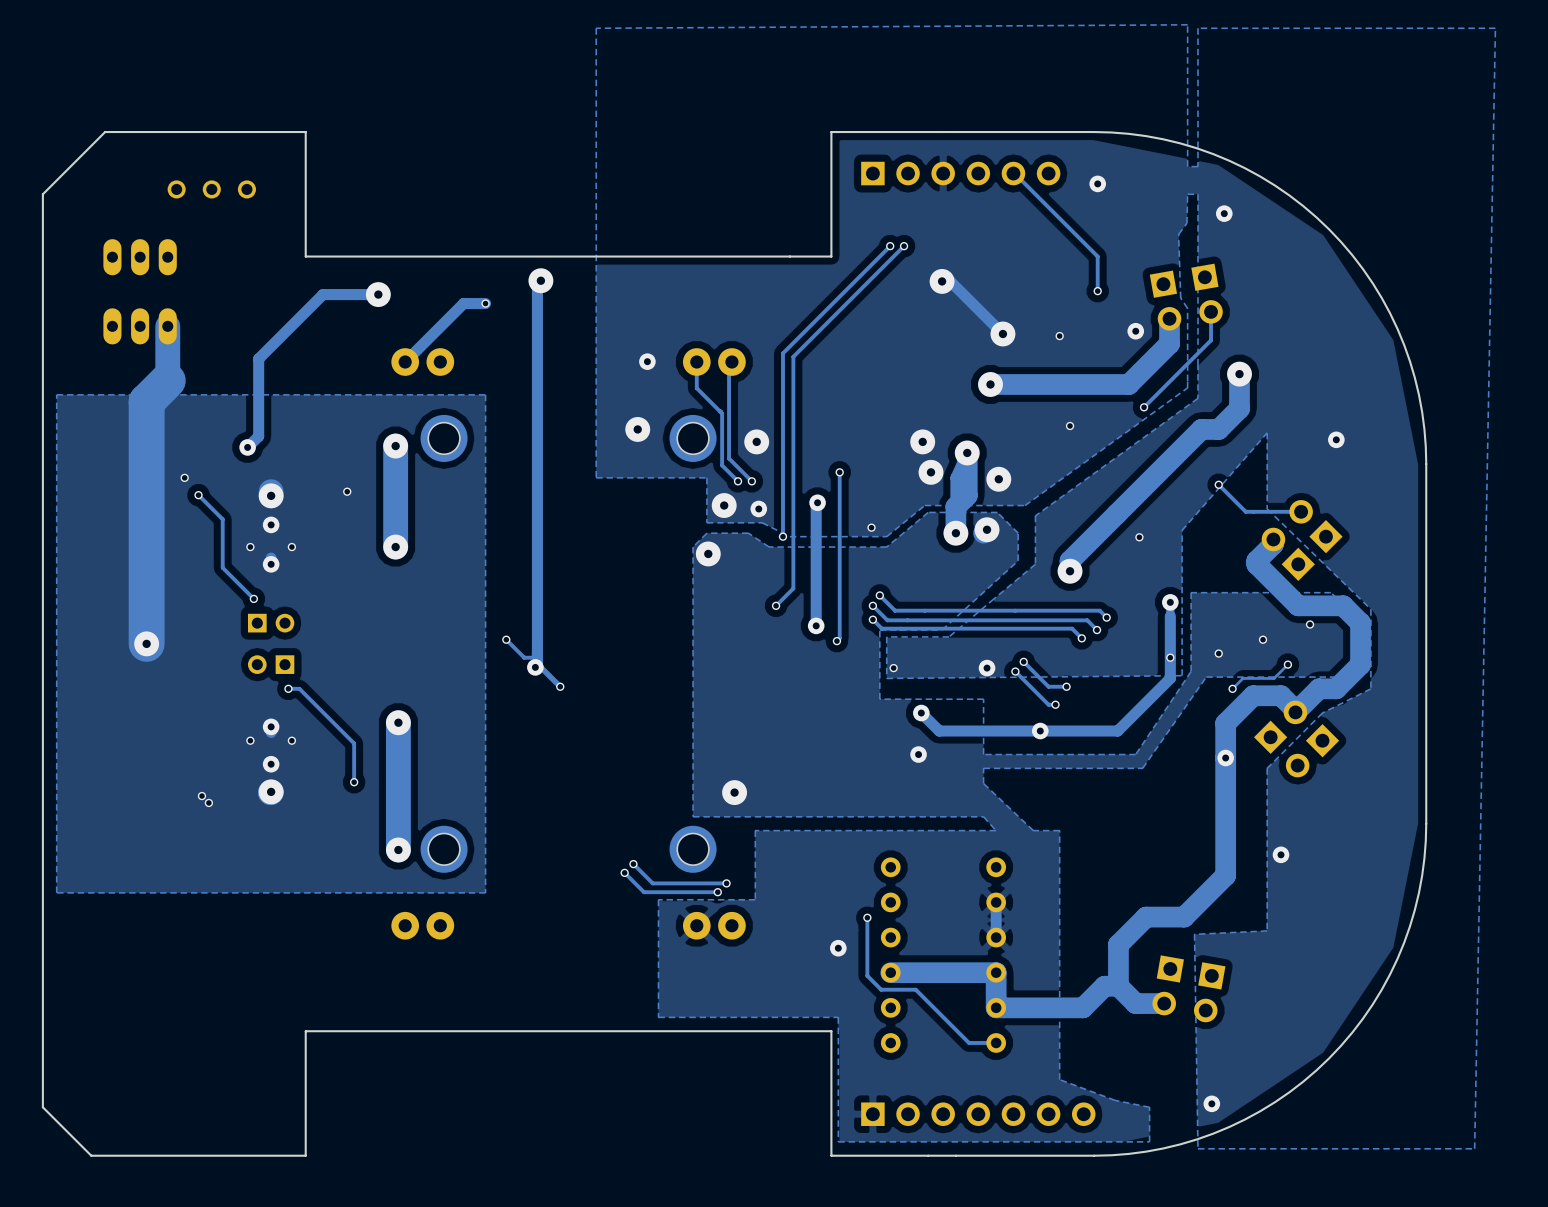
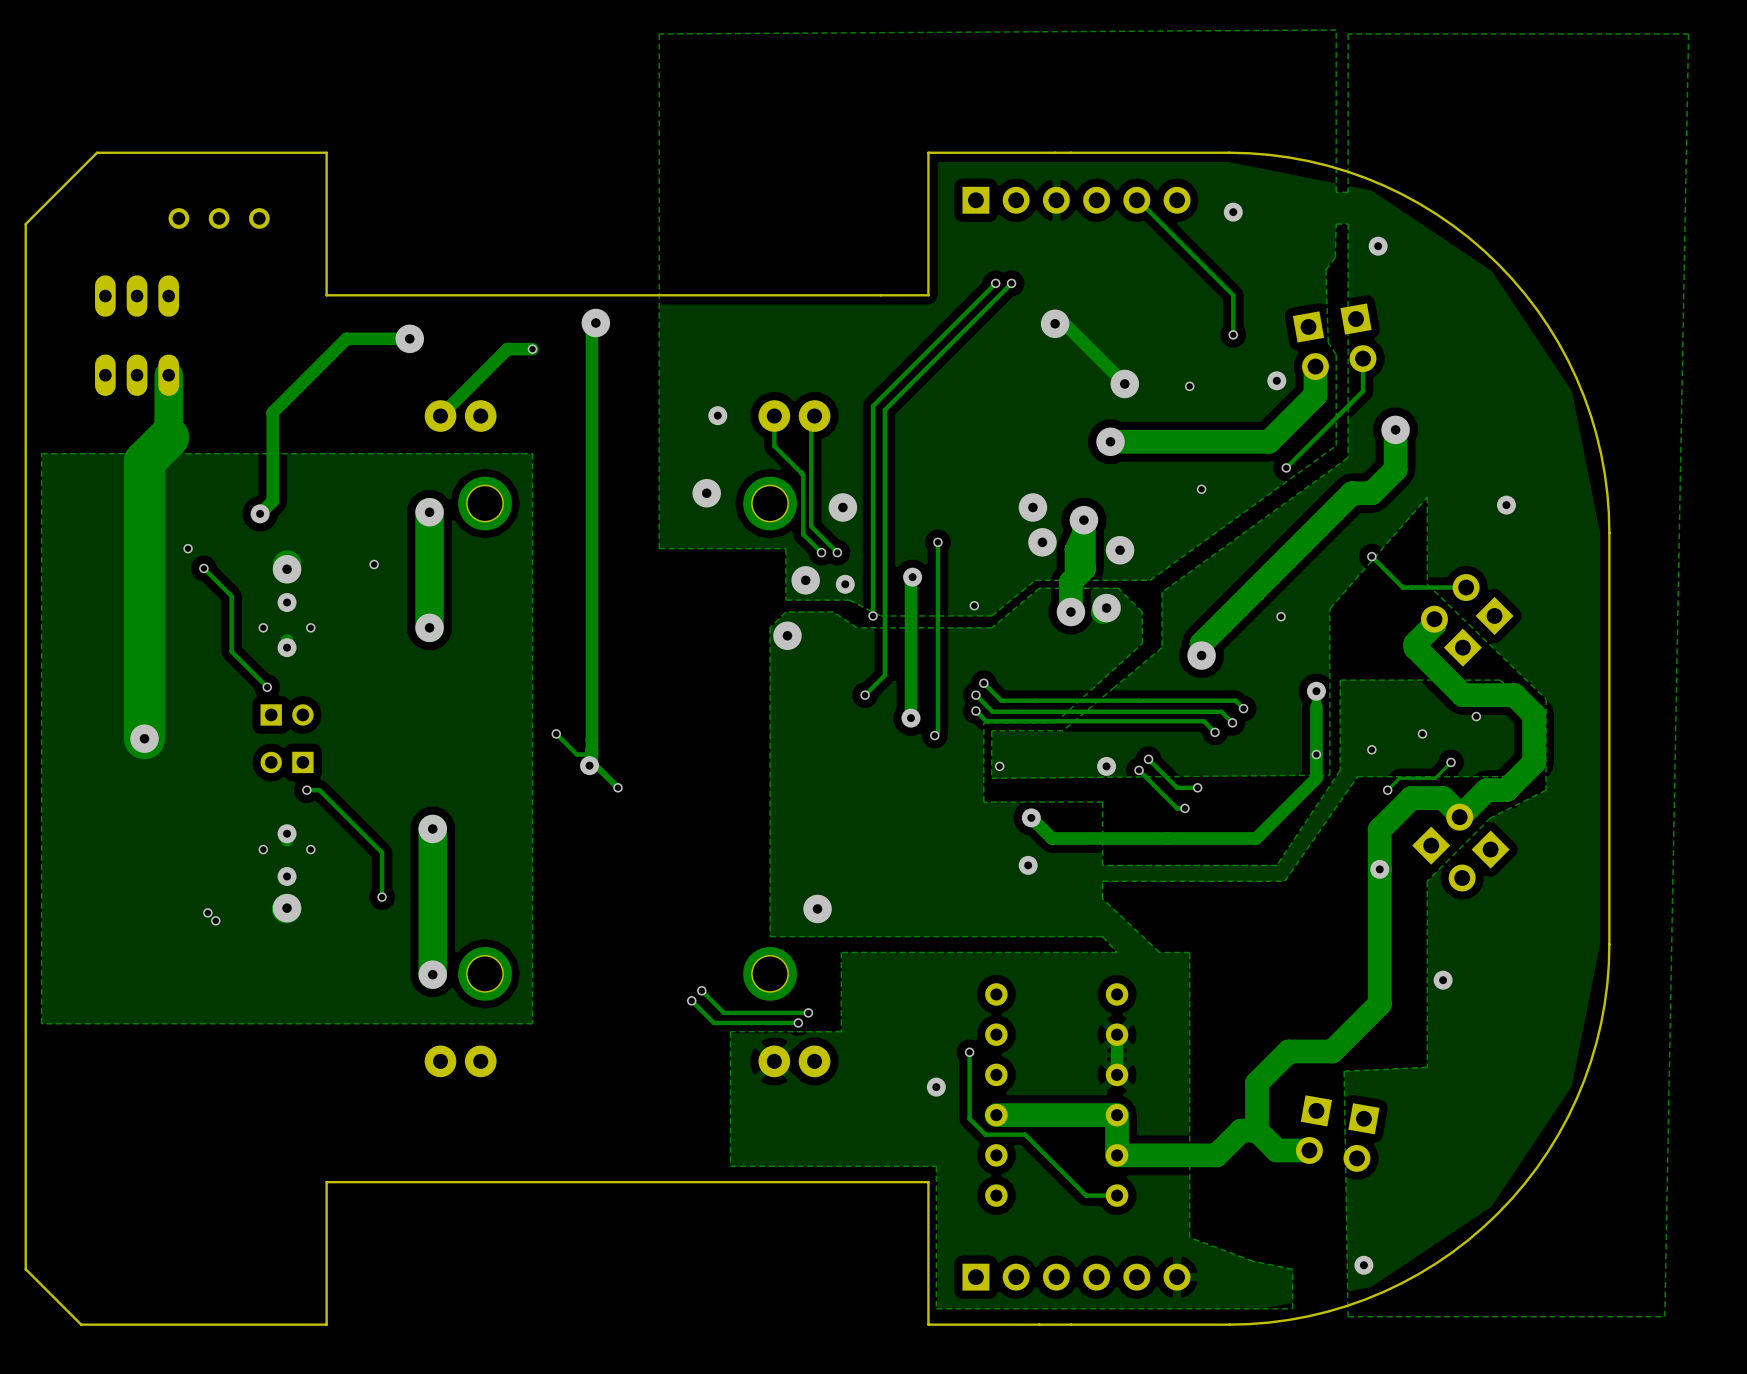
via: (1040, 731) -> none
part: none -> (1076, 1277)
part: (978, 1114) -> none

